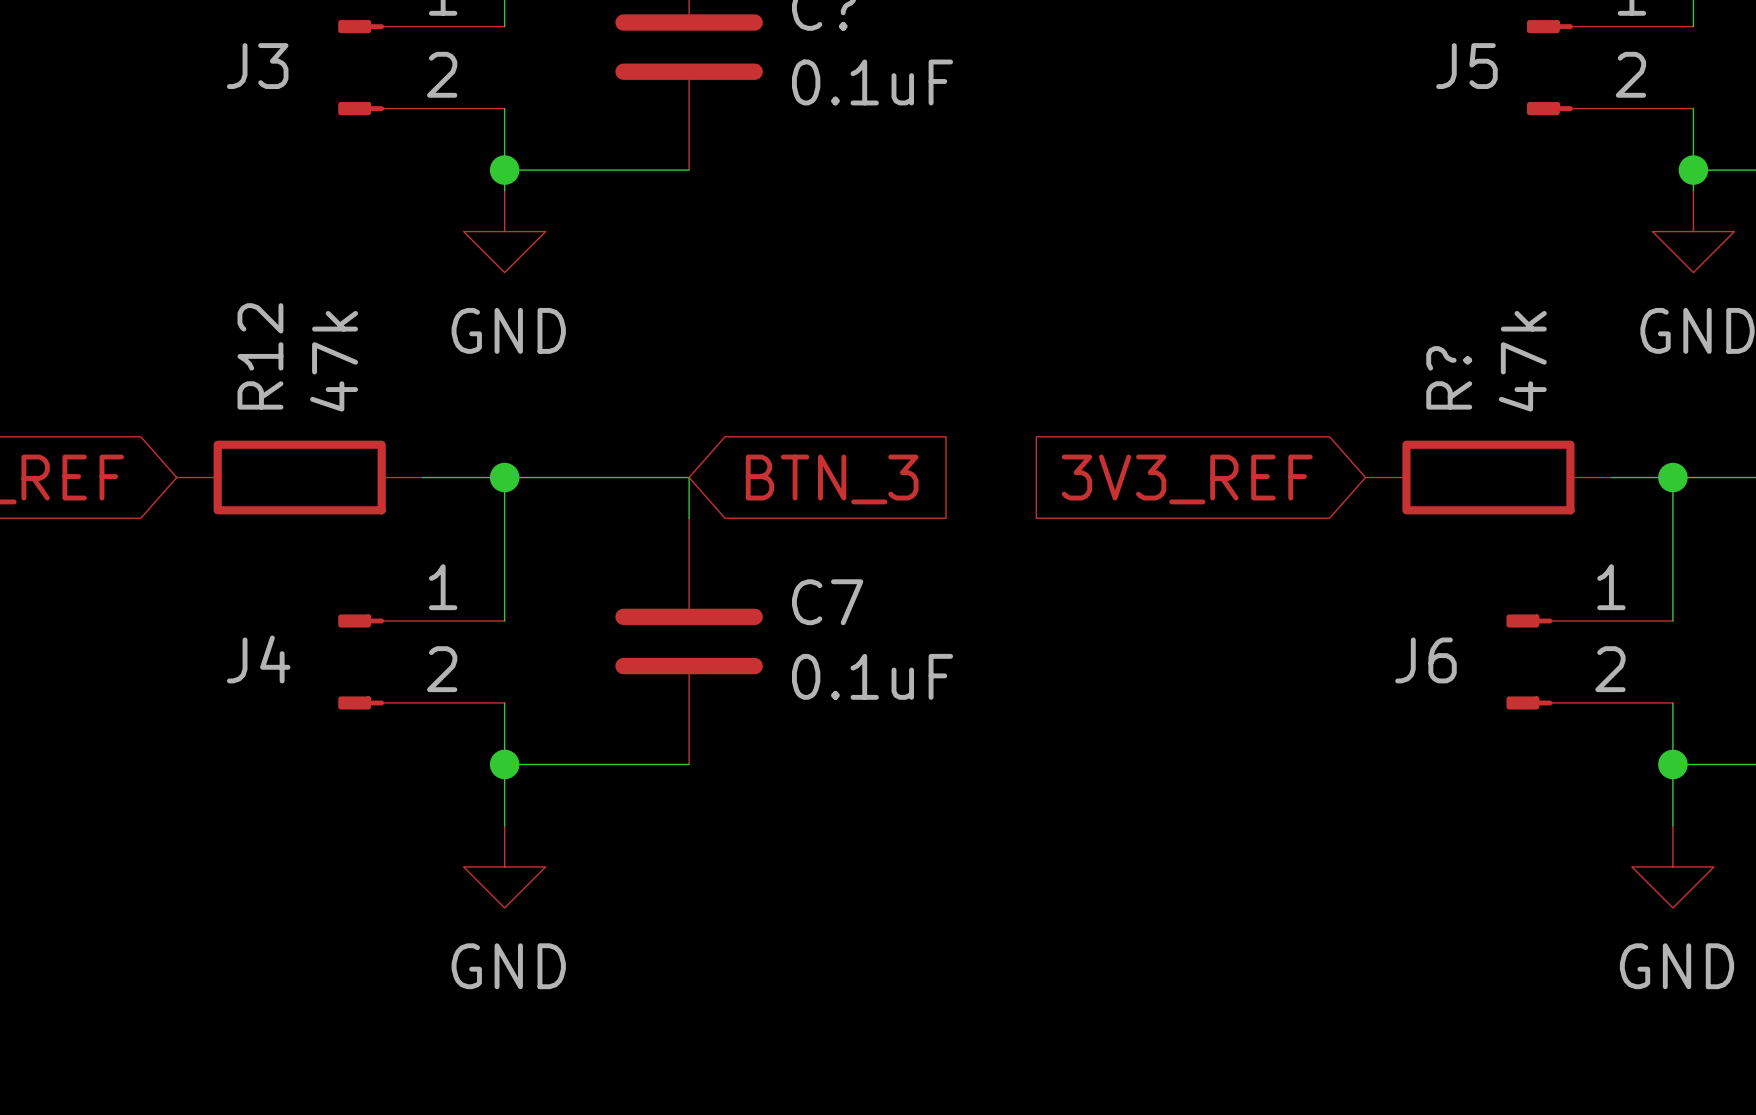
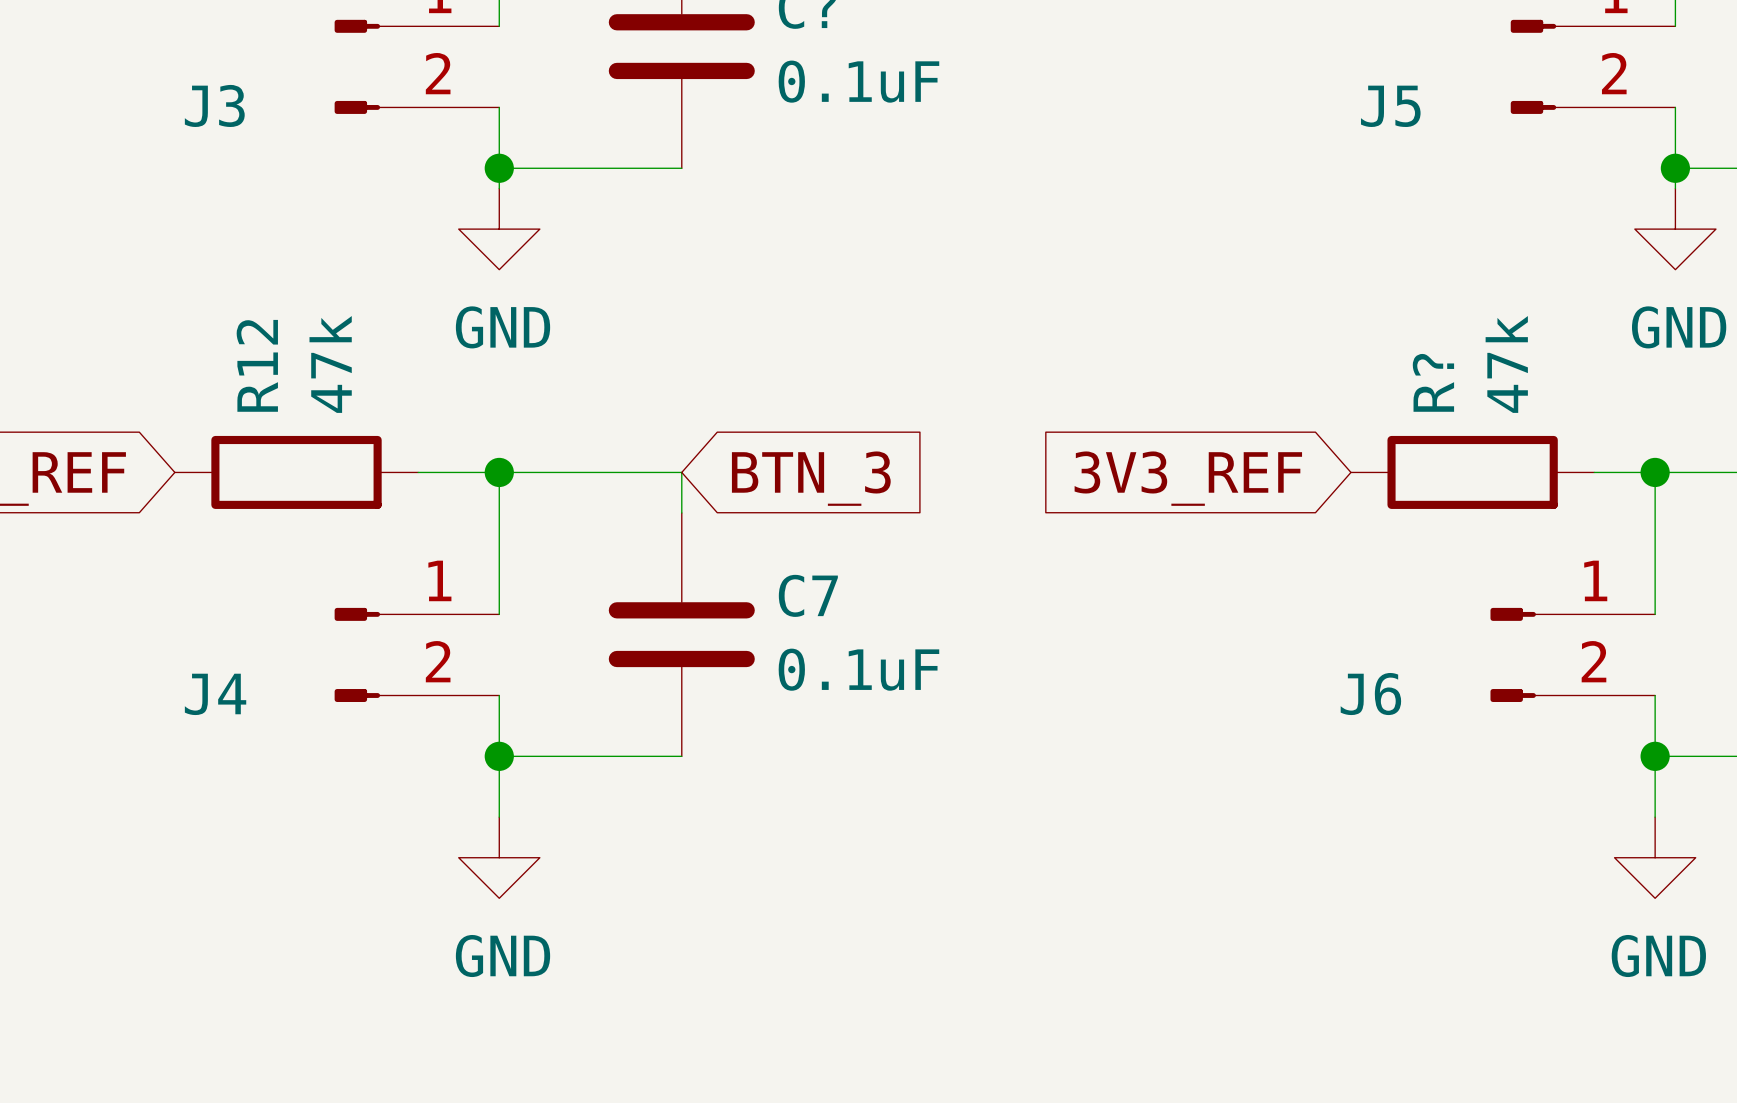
J3 name position: J3 (257, 66) -> J3 (214, 105)
J5 name position: J5 (1466, 66) -> J5 (1390, 106)
J4 name position: J4 (258, 659) -> J4 (215, 694)
J6 name position: J6 (1425, 660) -> J6 (1370, 694)

